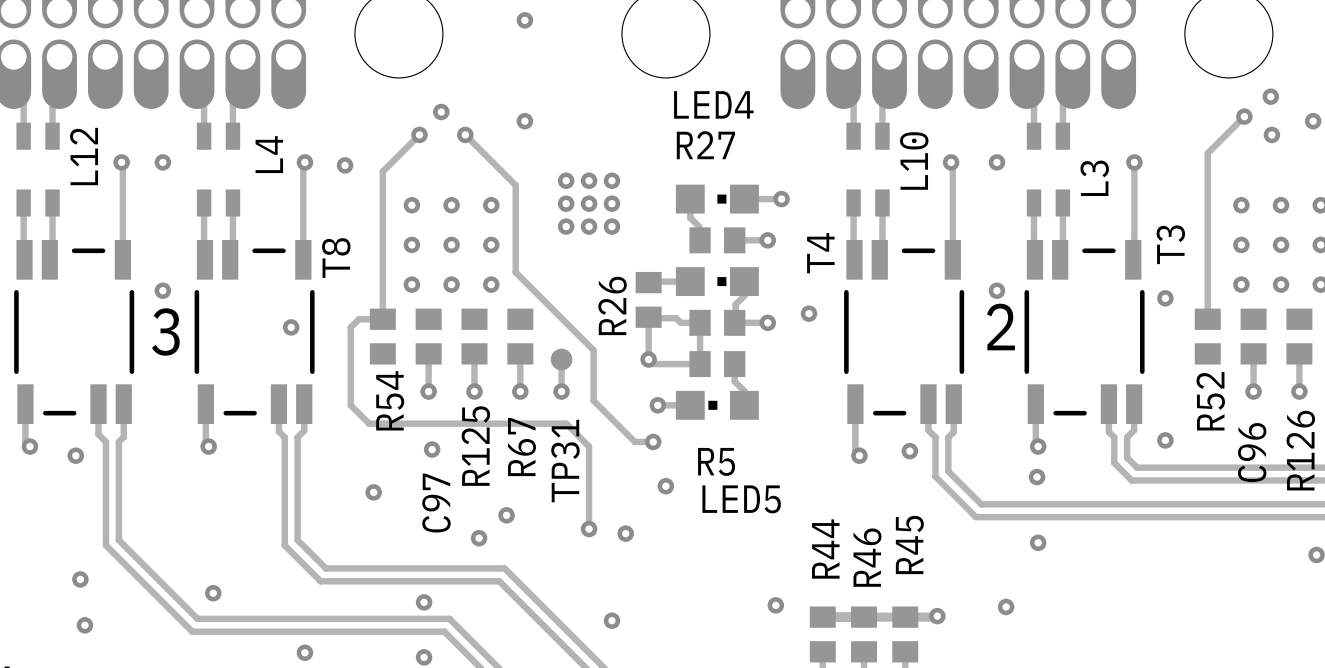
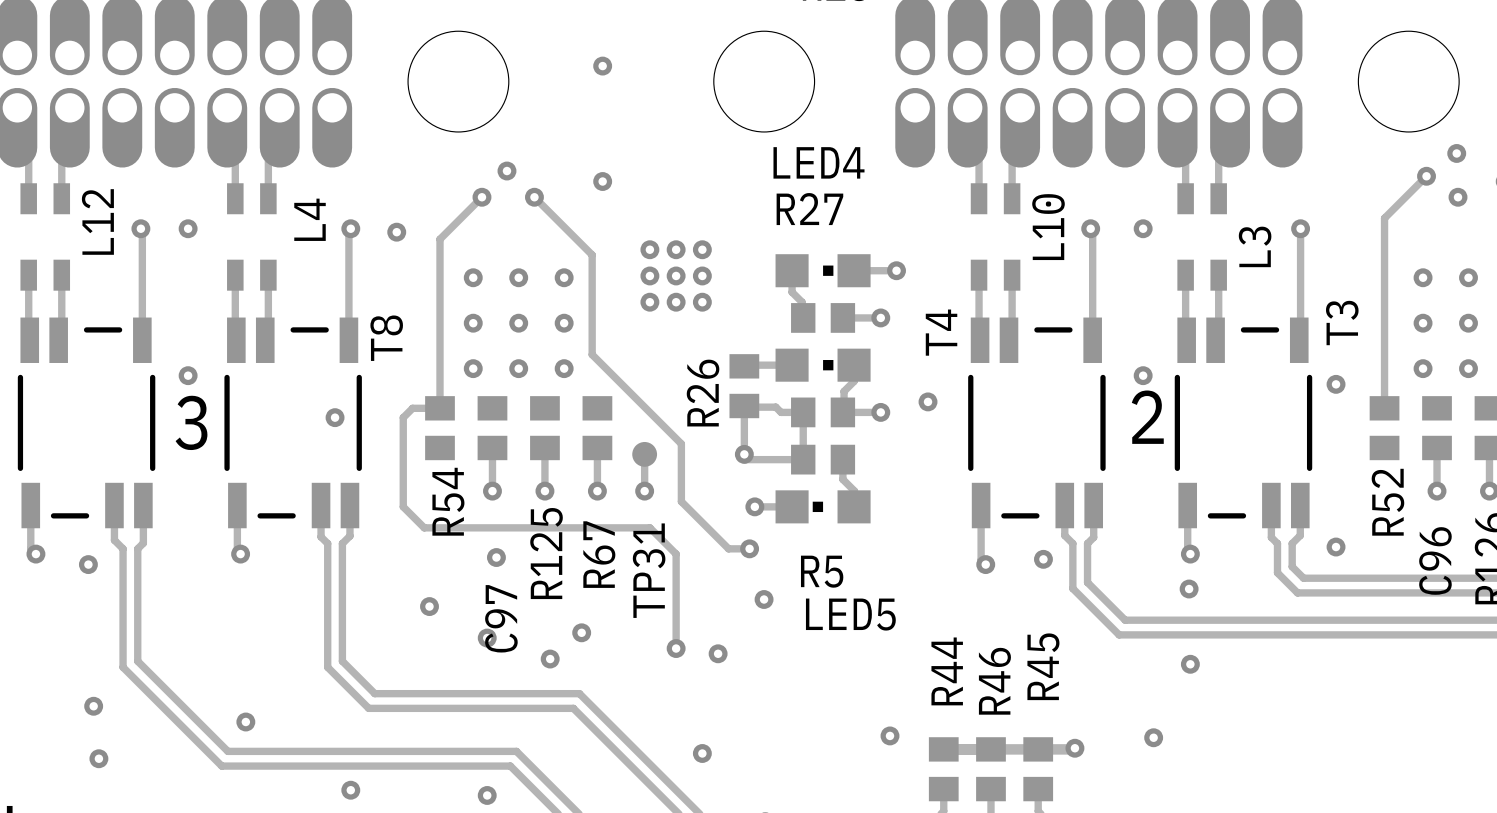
via position: (424, 602) -> (487, 638)

